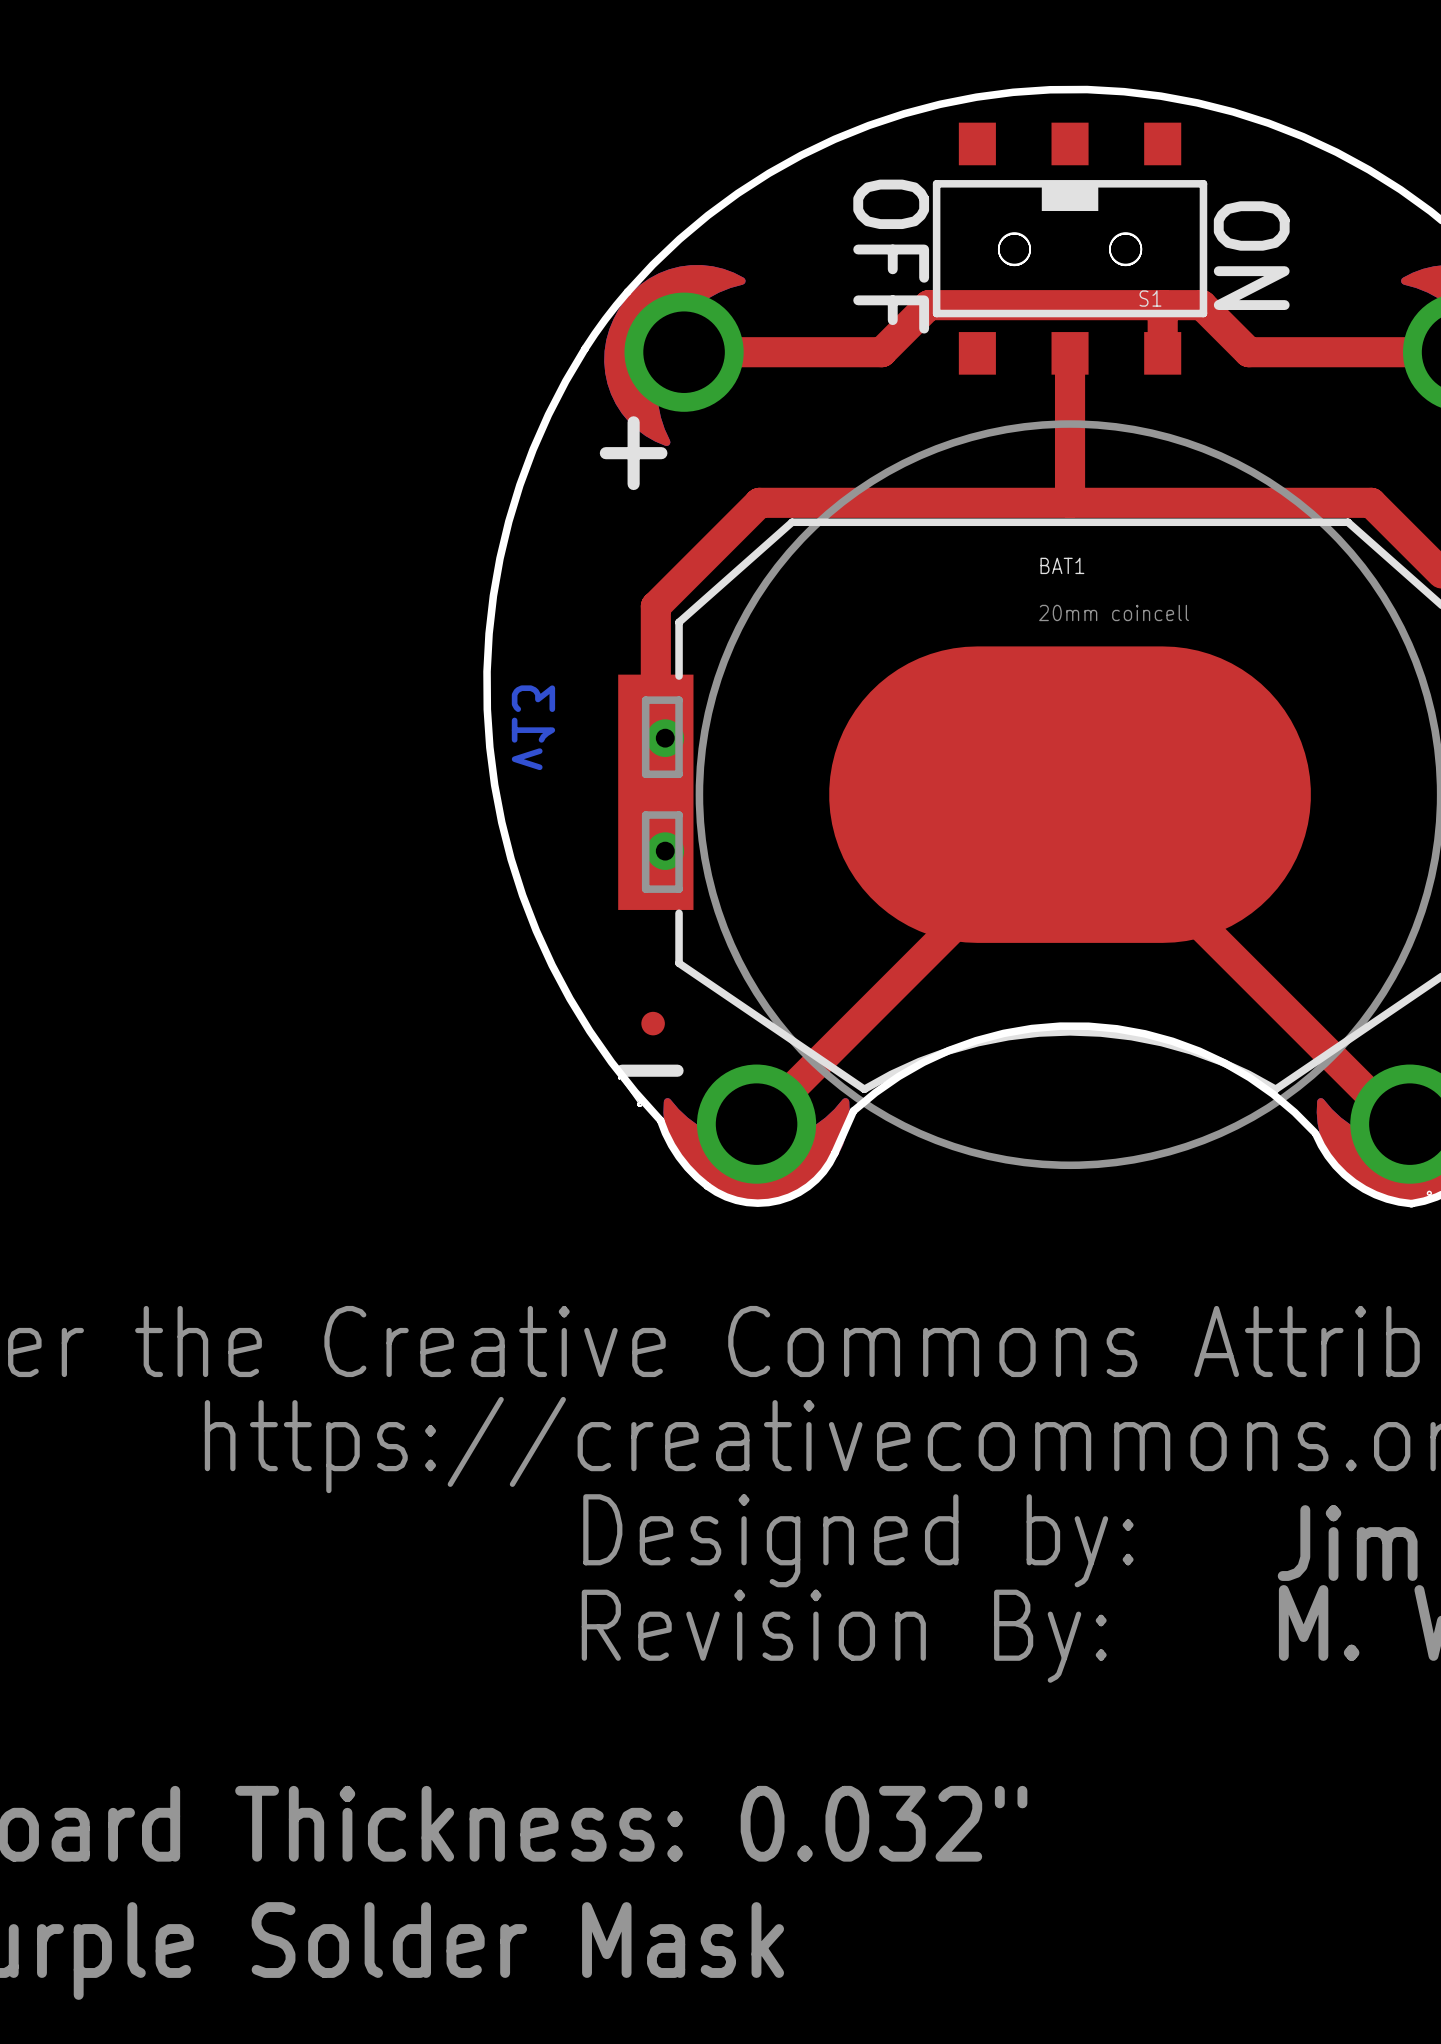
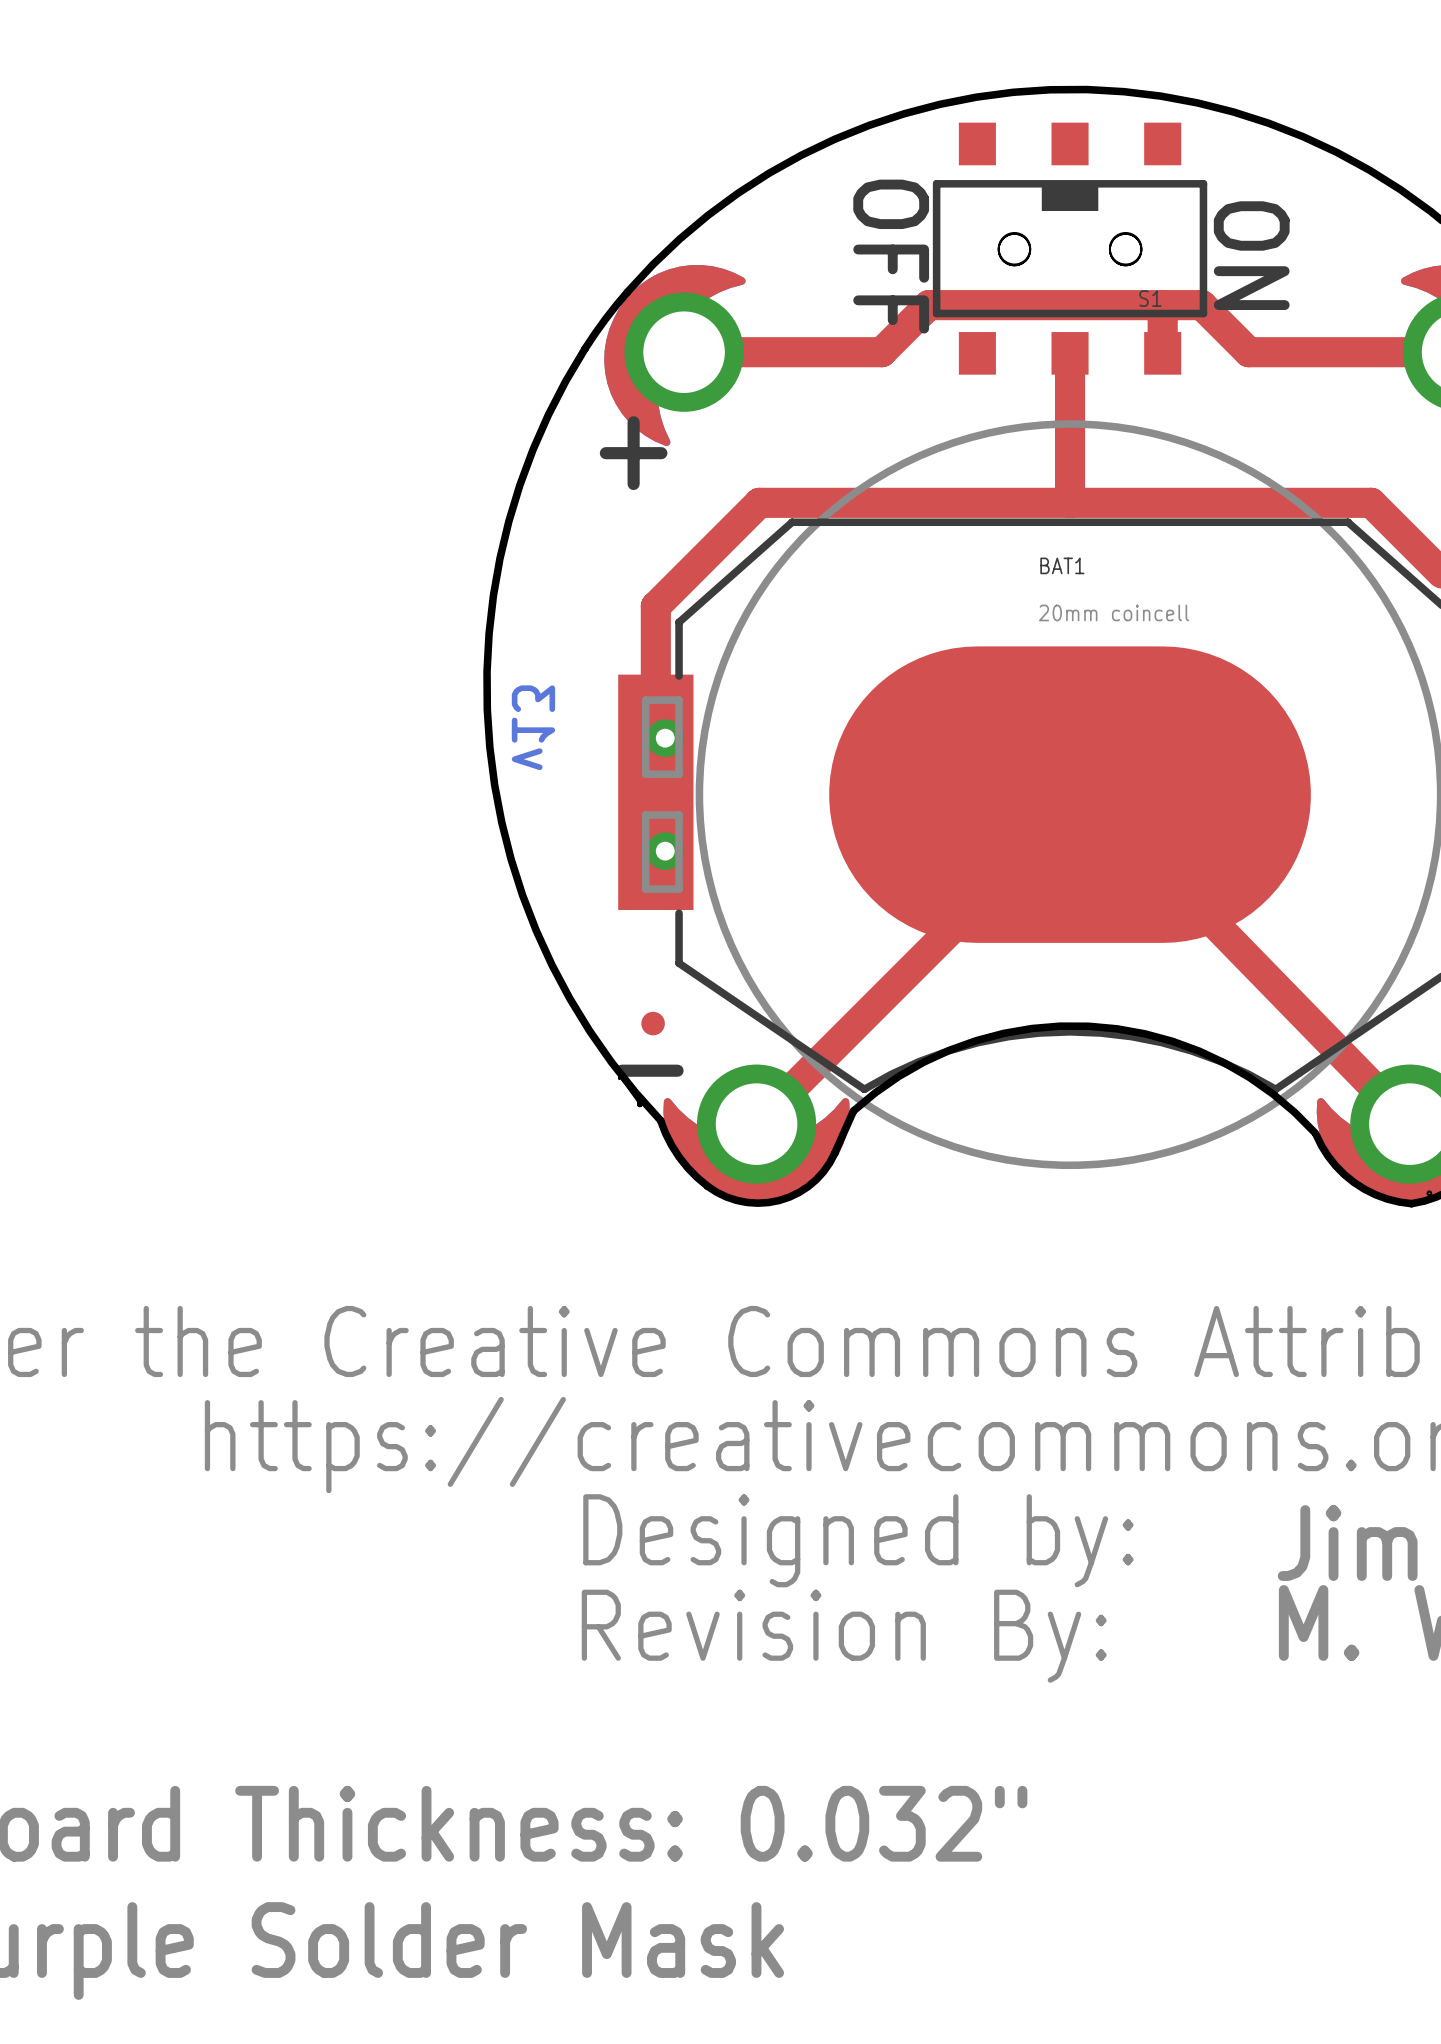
top track: (1070, 794) (1399, 1124) (1409, 1124) -> (1070, 794) (1088, 794) (1409, 1124)

